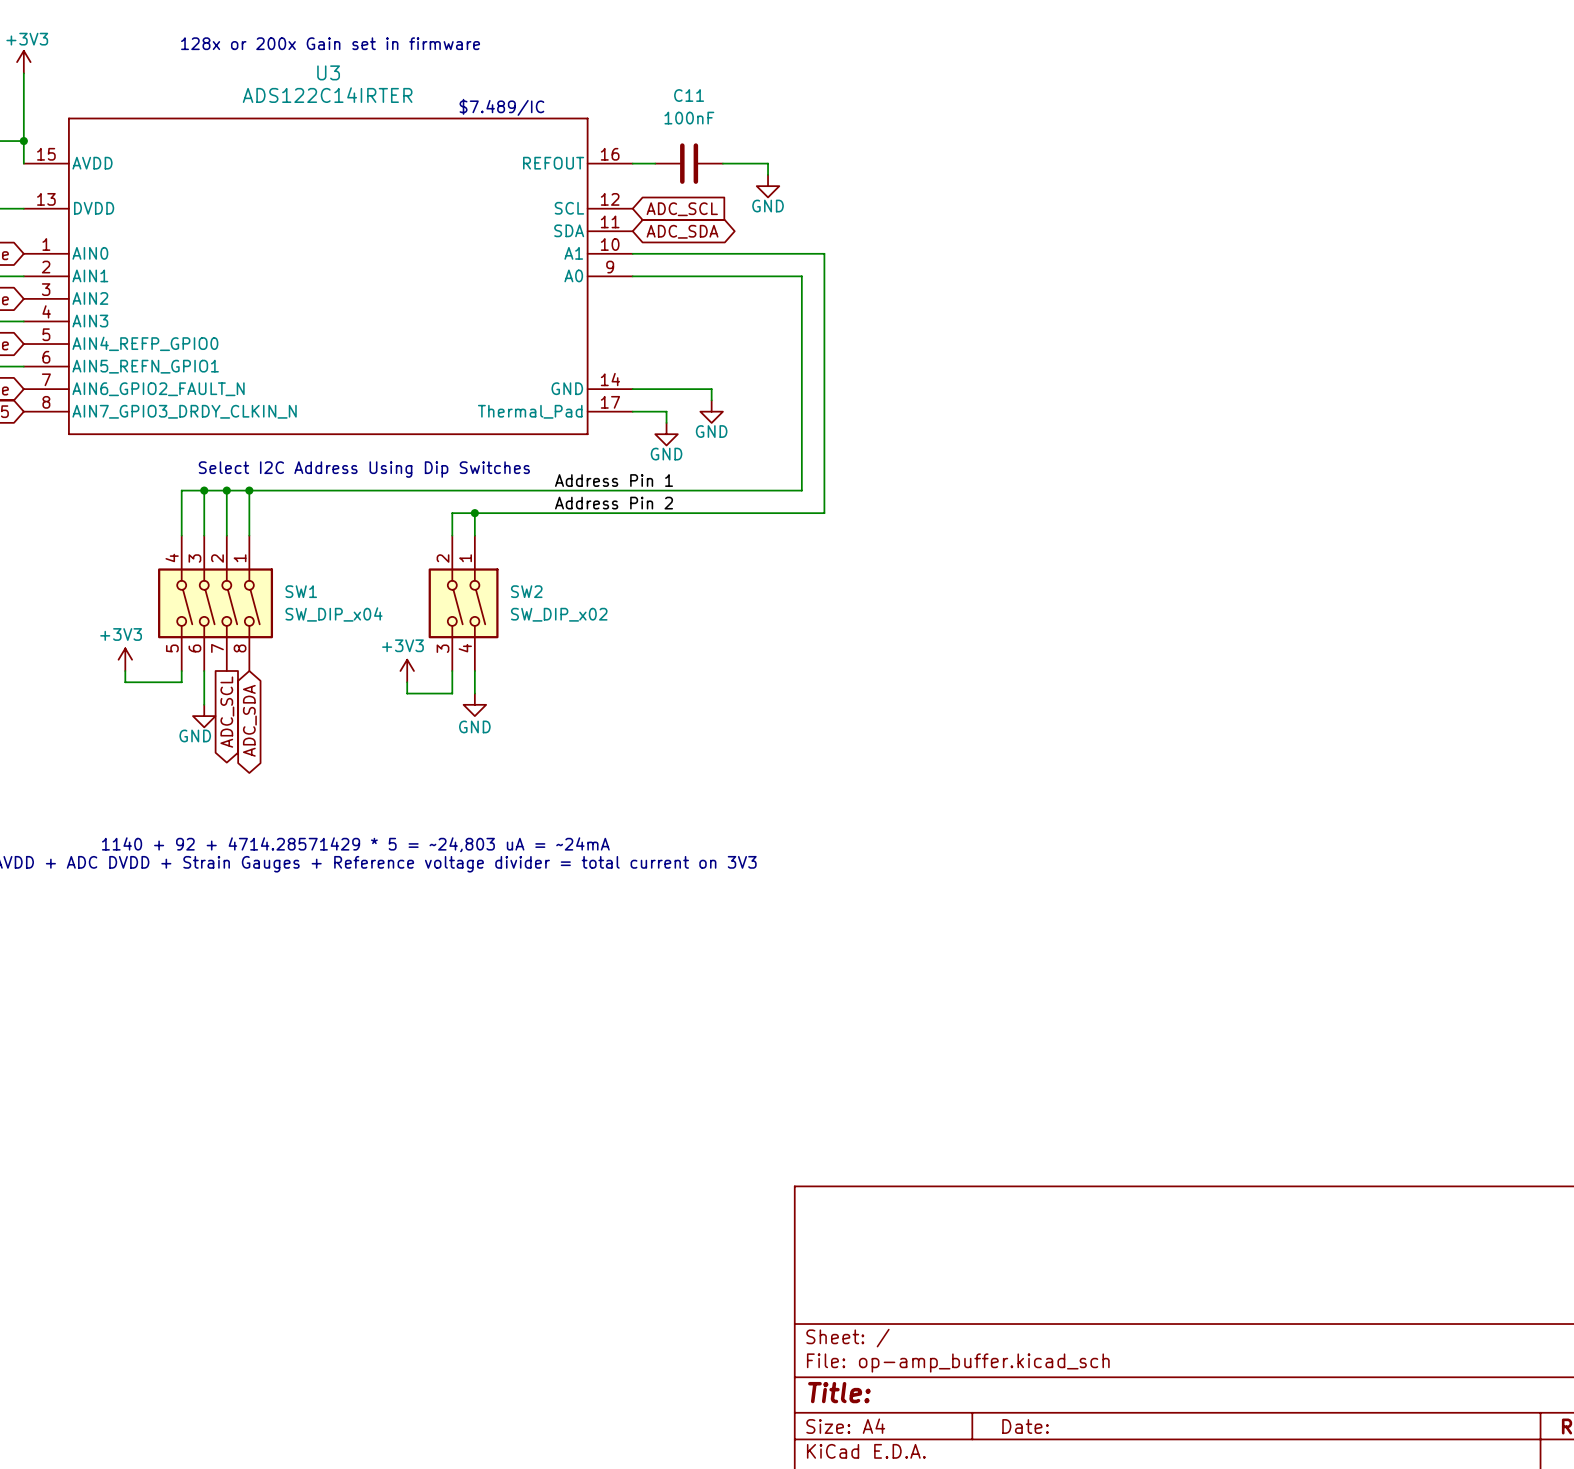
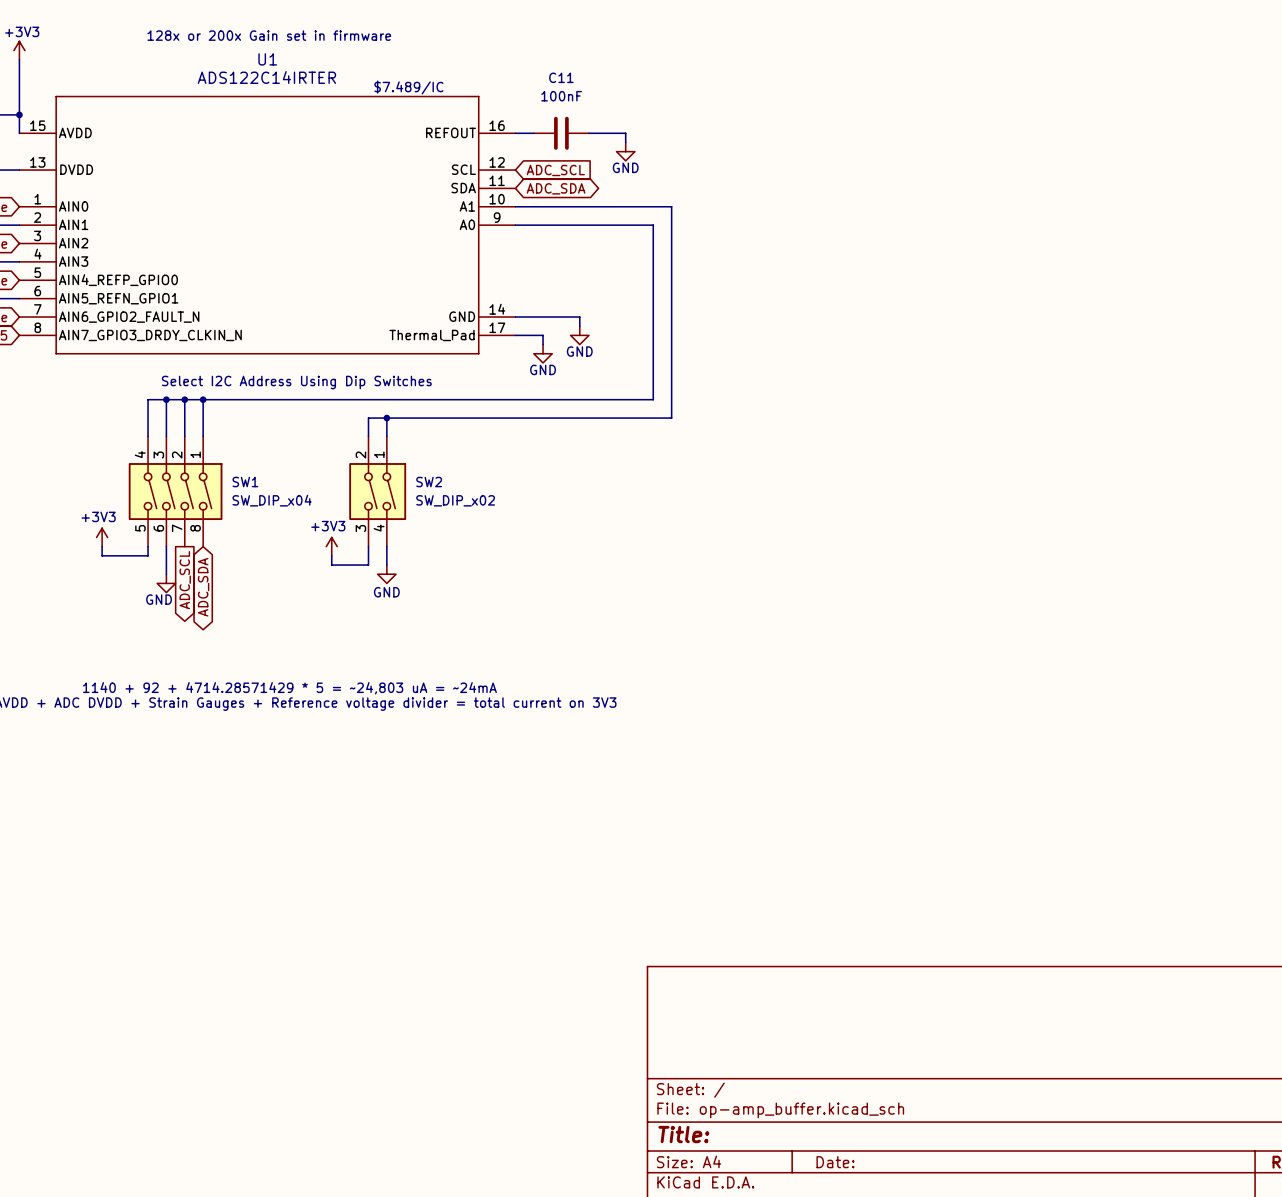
U3 name: U3 (328, 72) -> U1 (267, 59)
label: Address Pin 1 (614, 480) -> none
label: Address Pin 2 (614, 503) -> none

